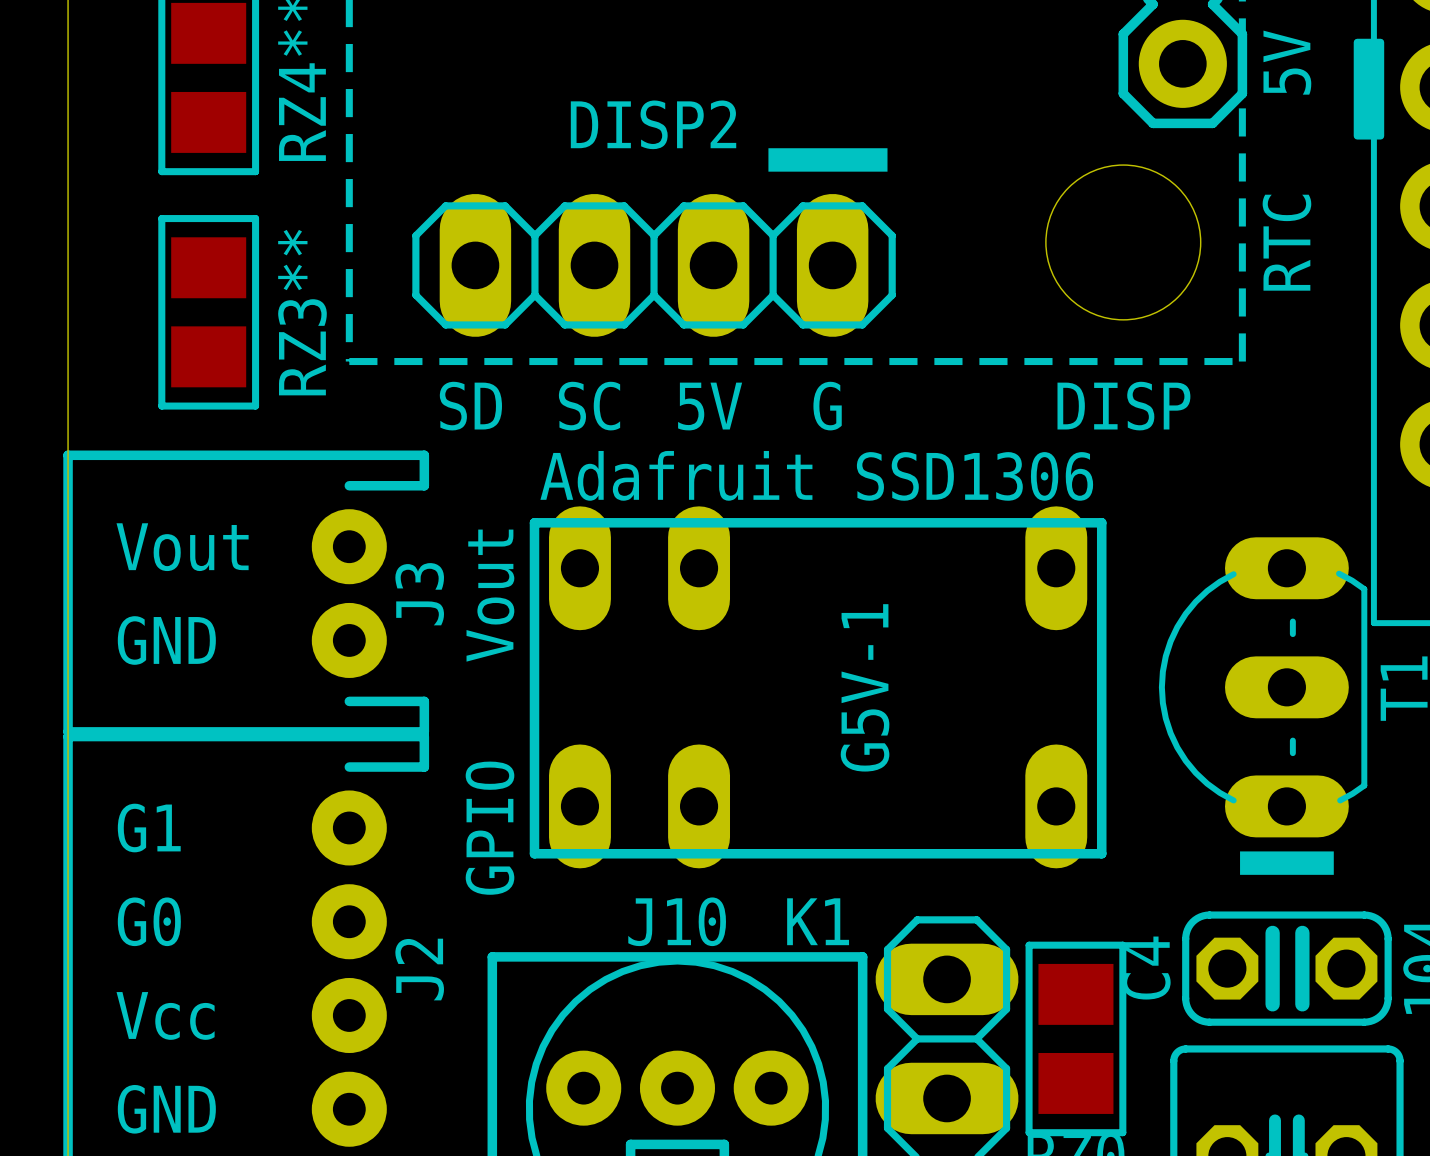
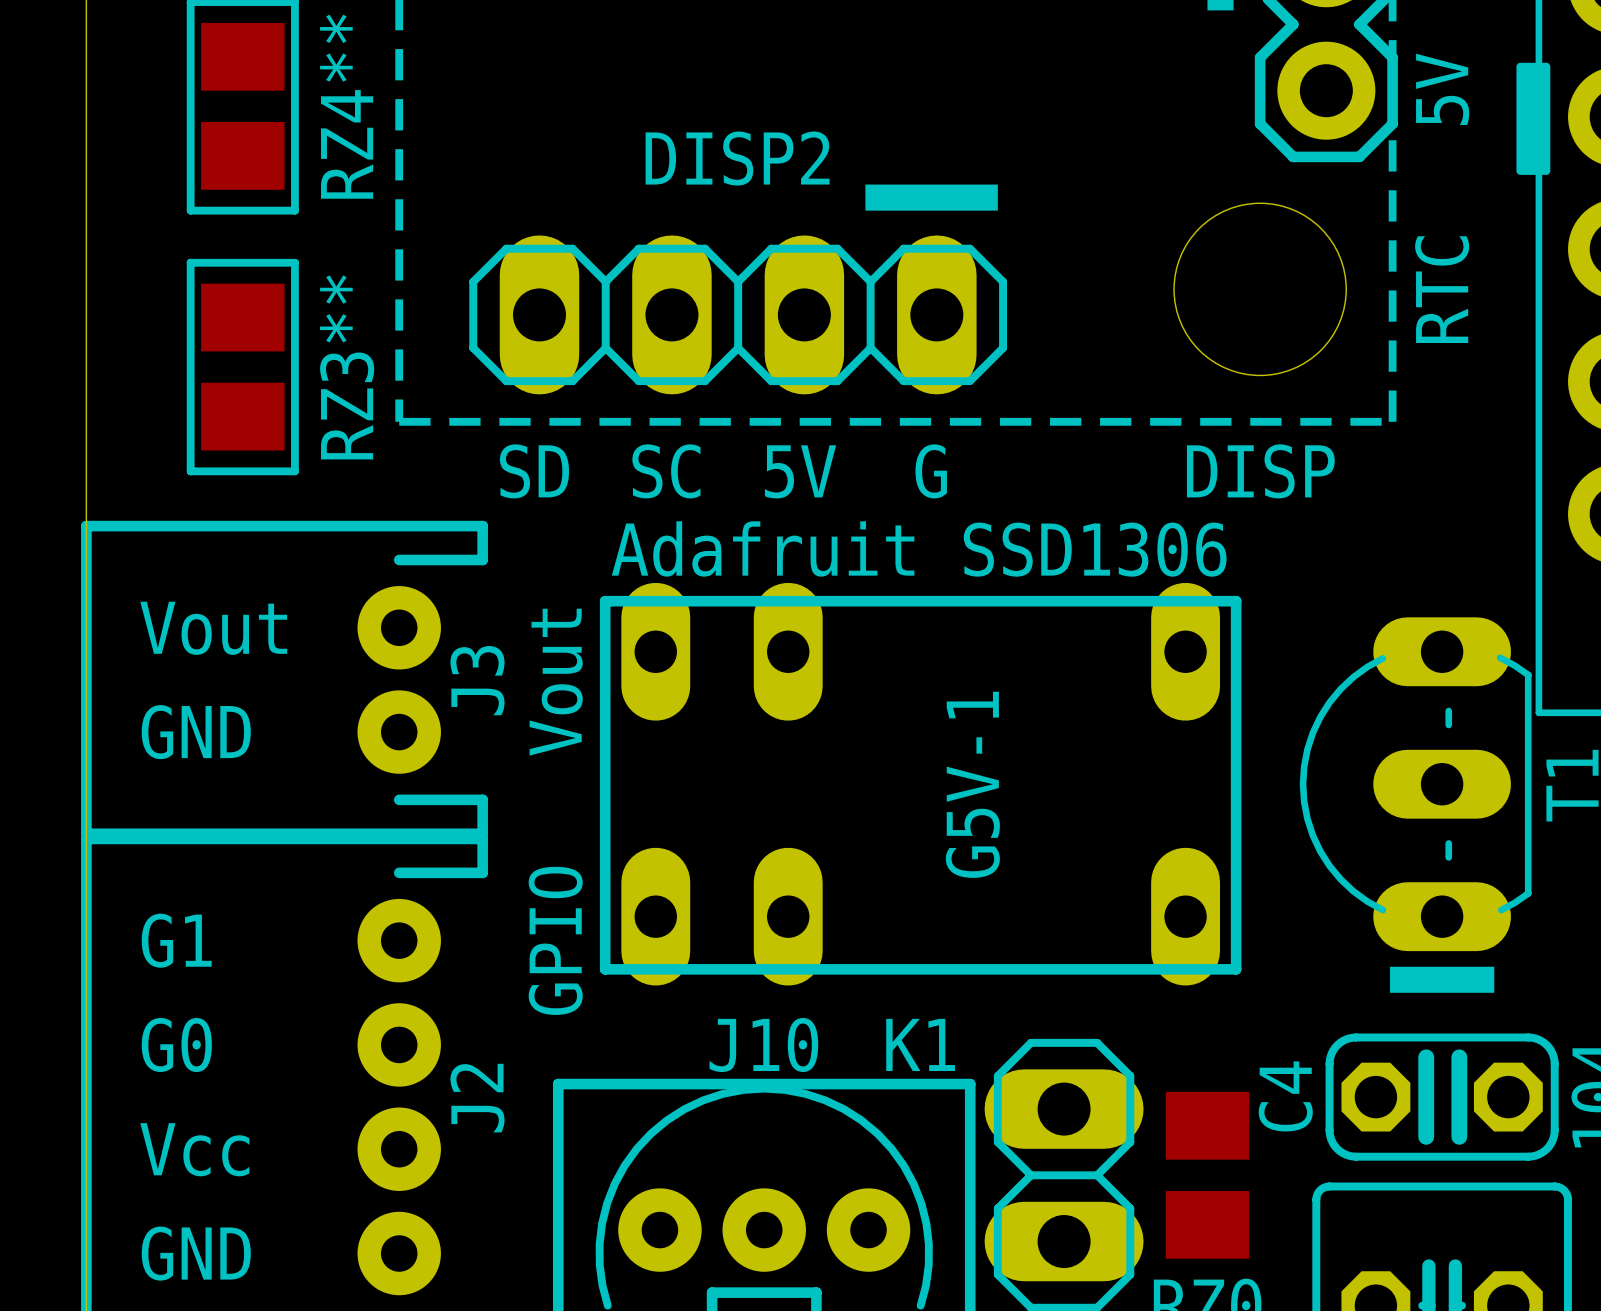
line: (1029, 945) (1122, 945) (1122, 1132) (1029, 1132) (1029, 945) -> none

